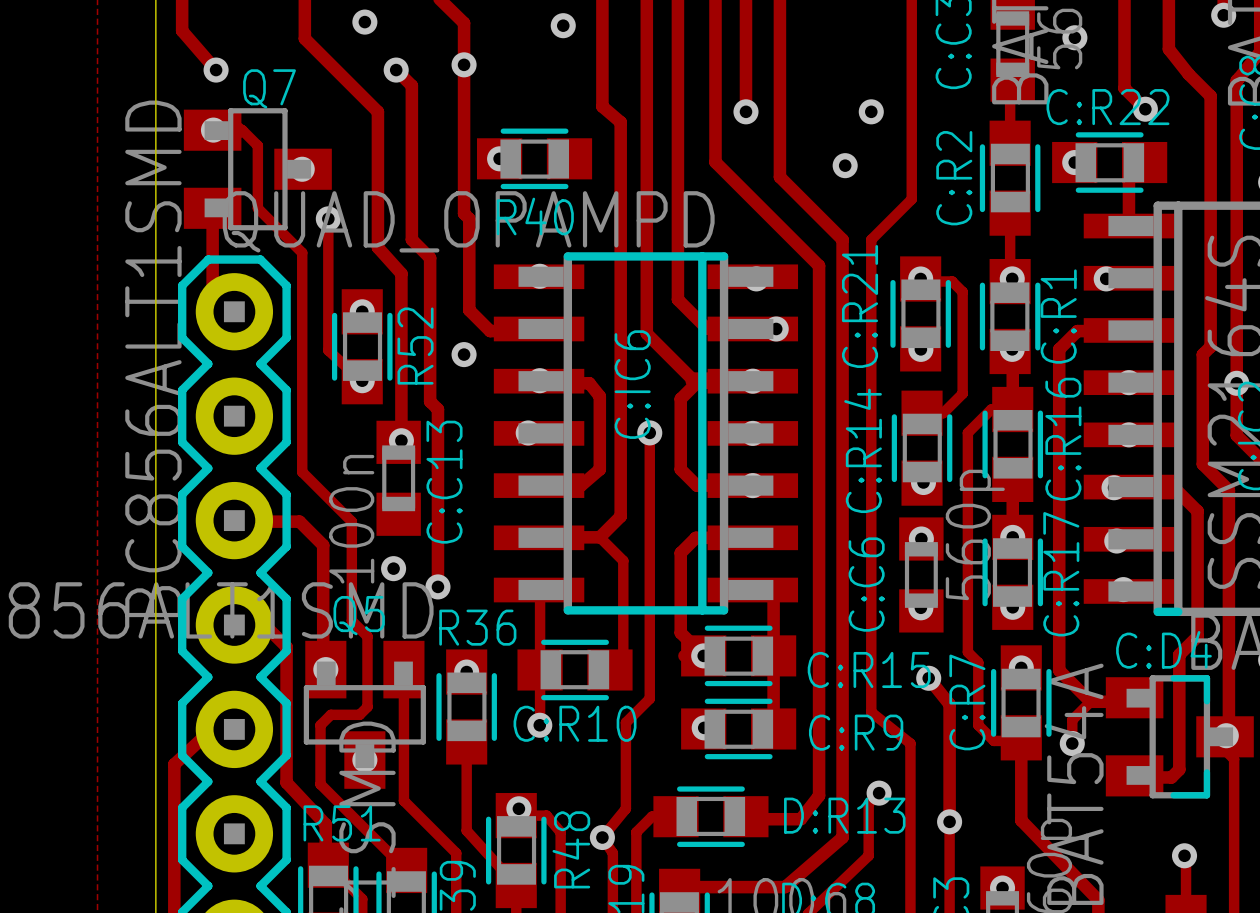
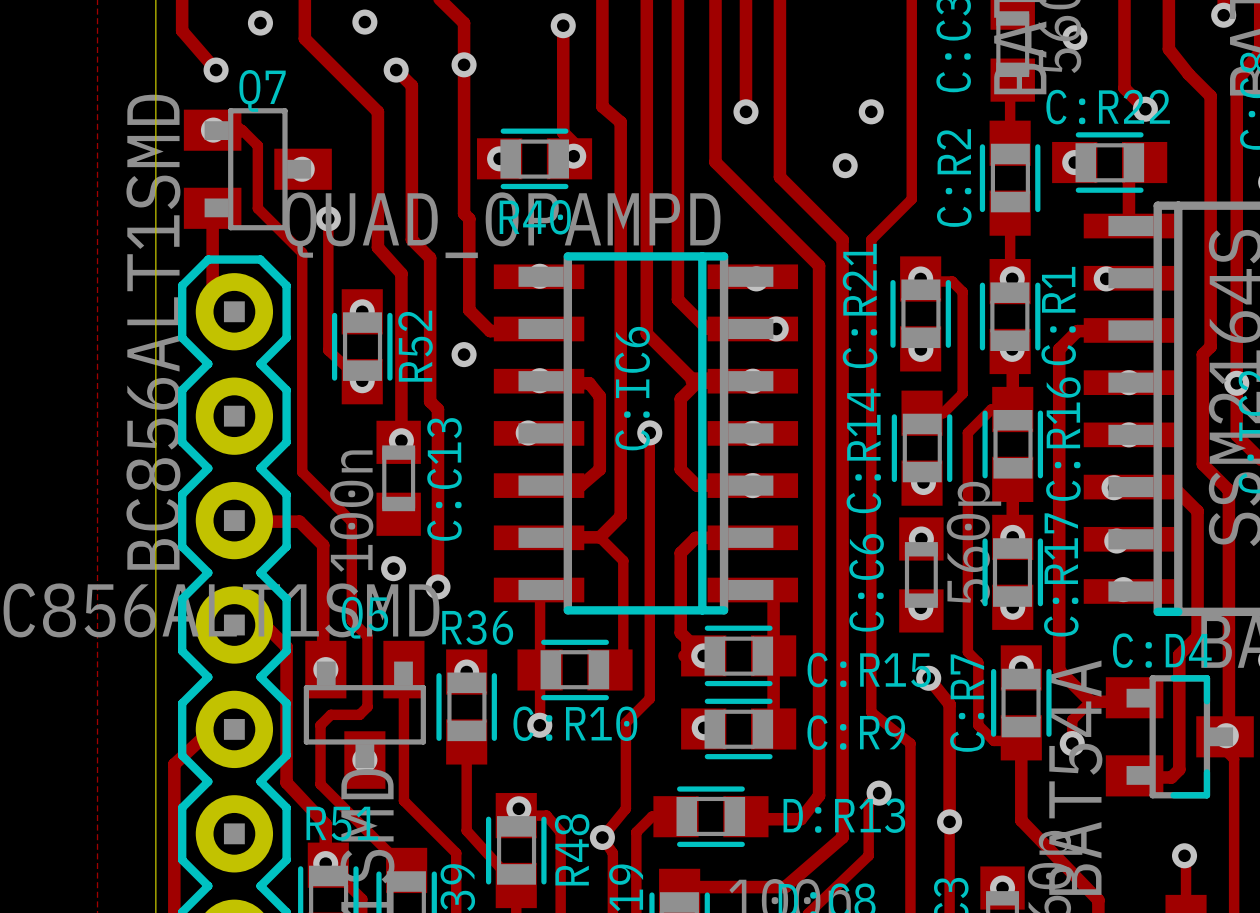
via: none -> (260, 23)
track: none -> (563, 25) (563, 132) (577, 146)
via: none -> (573, 156)
via: none -> (325, 863)

